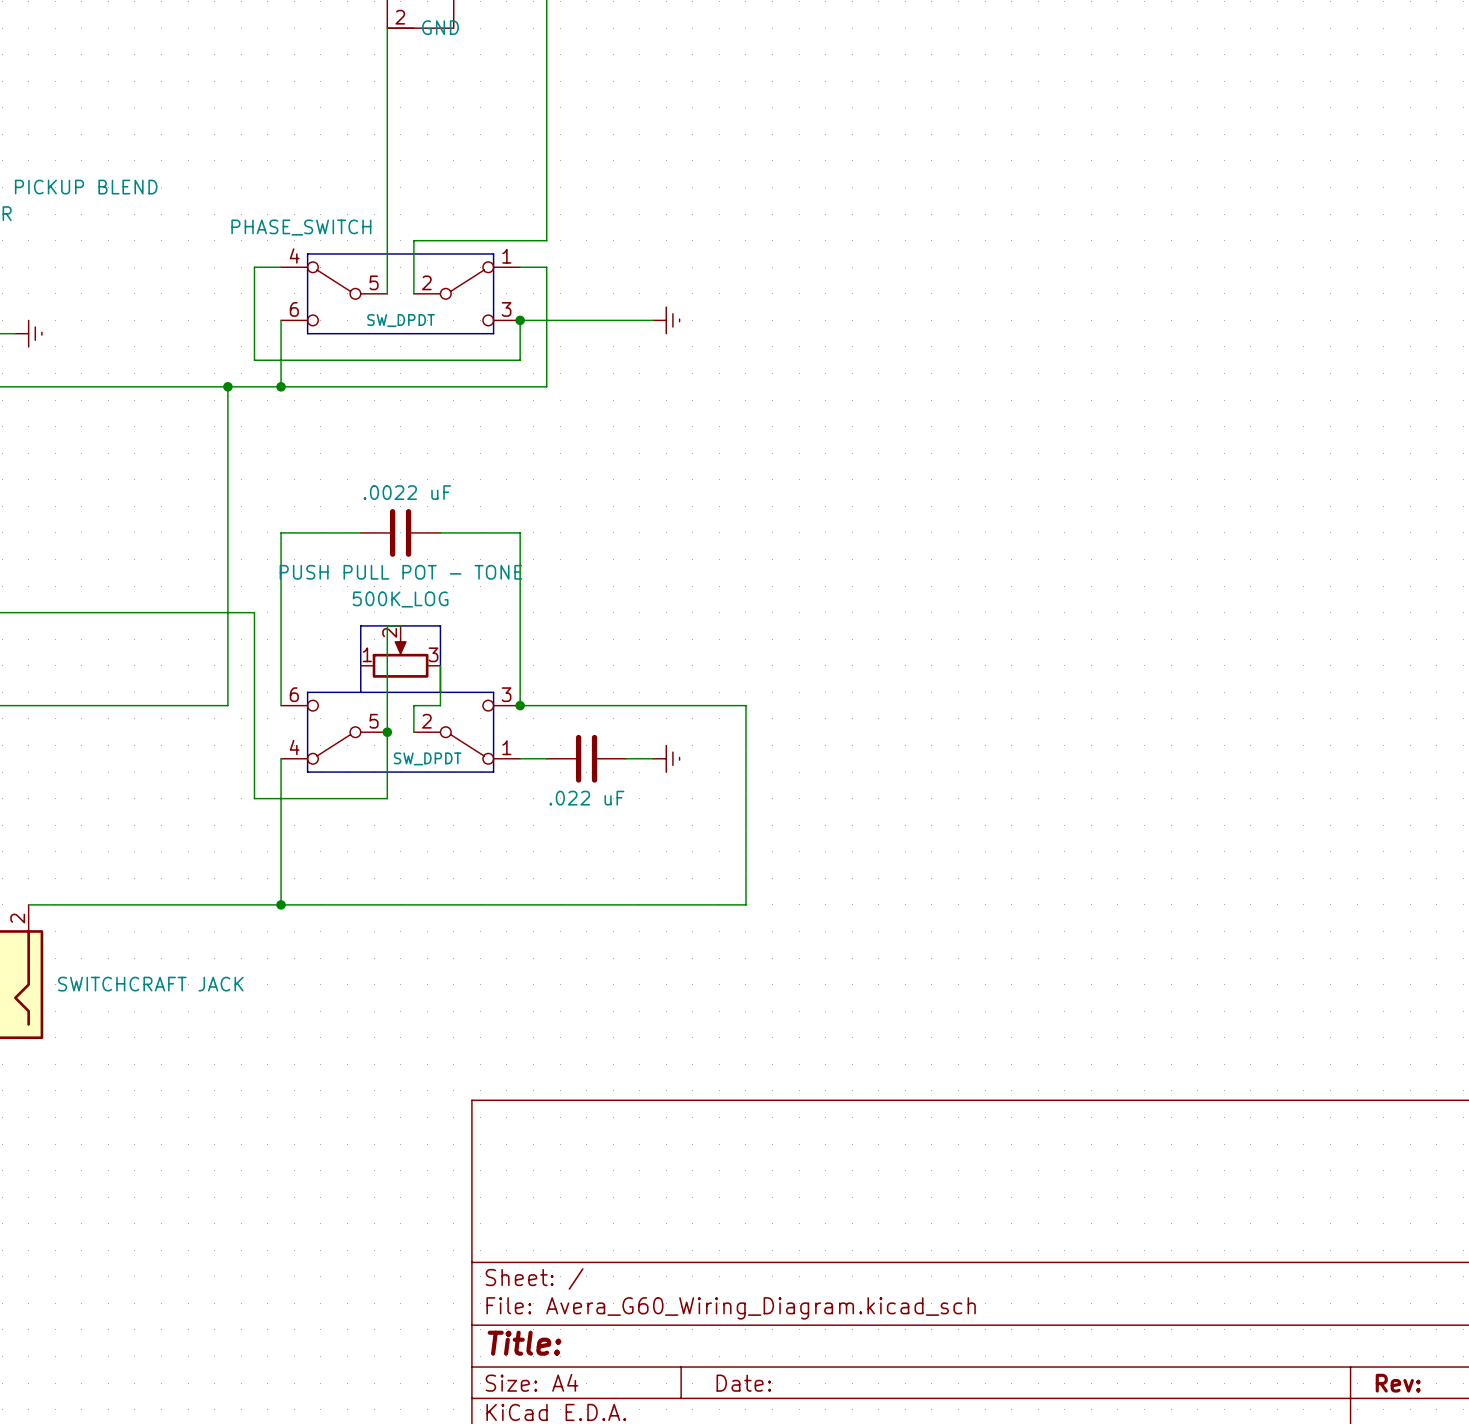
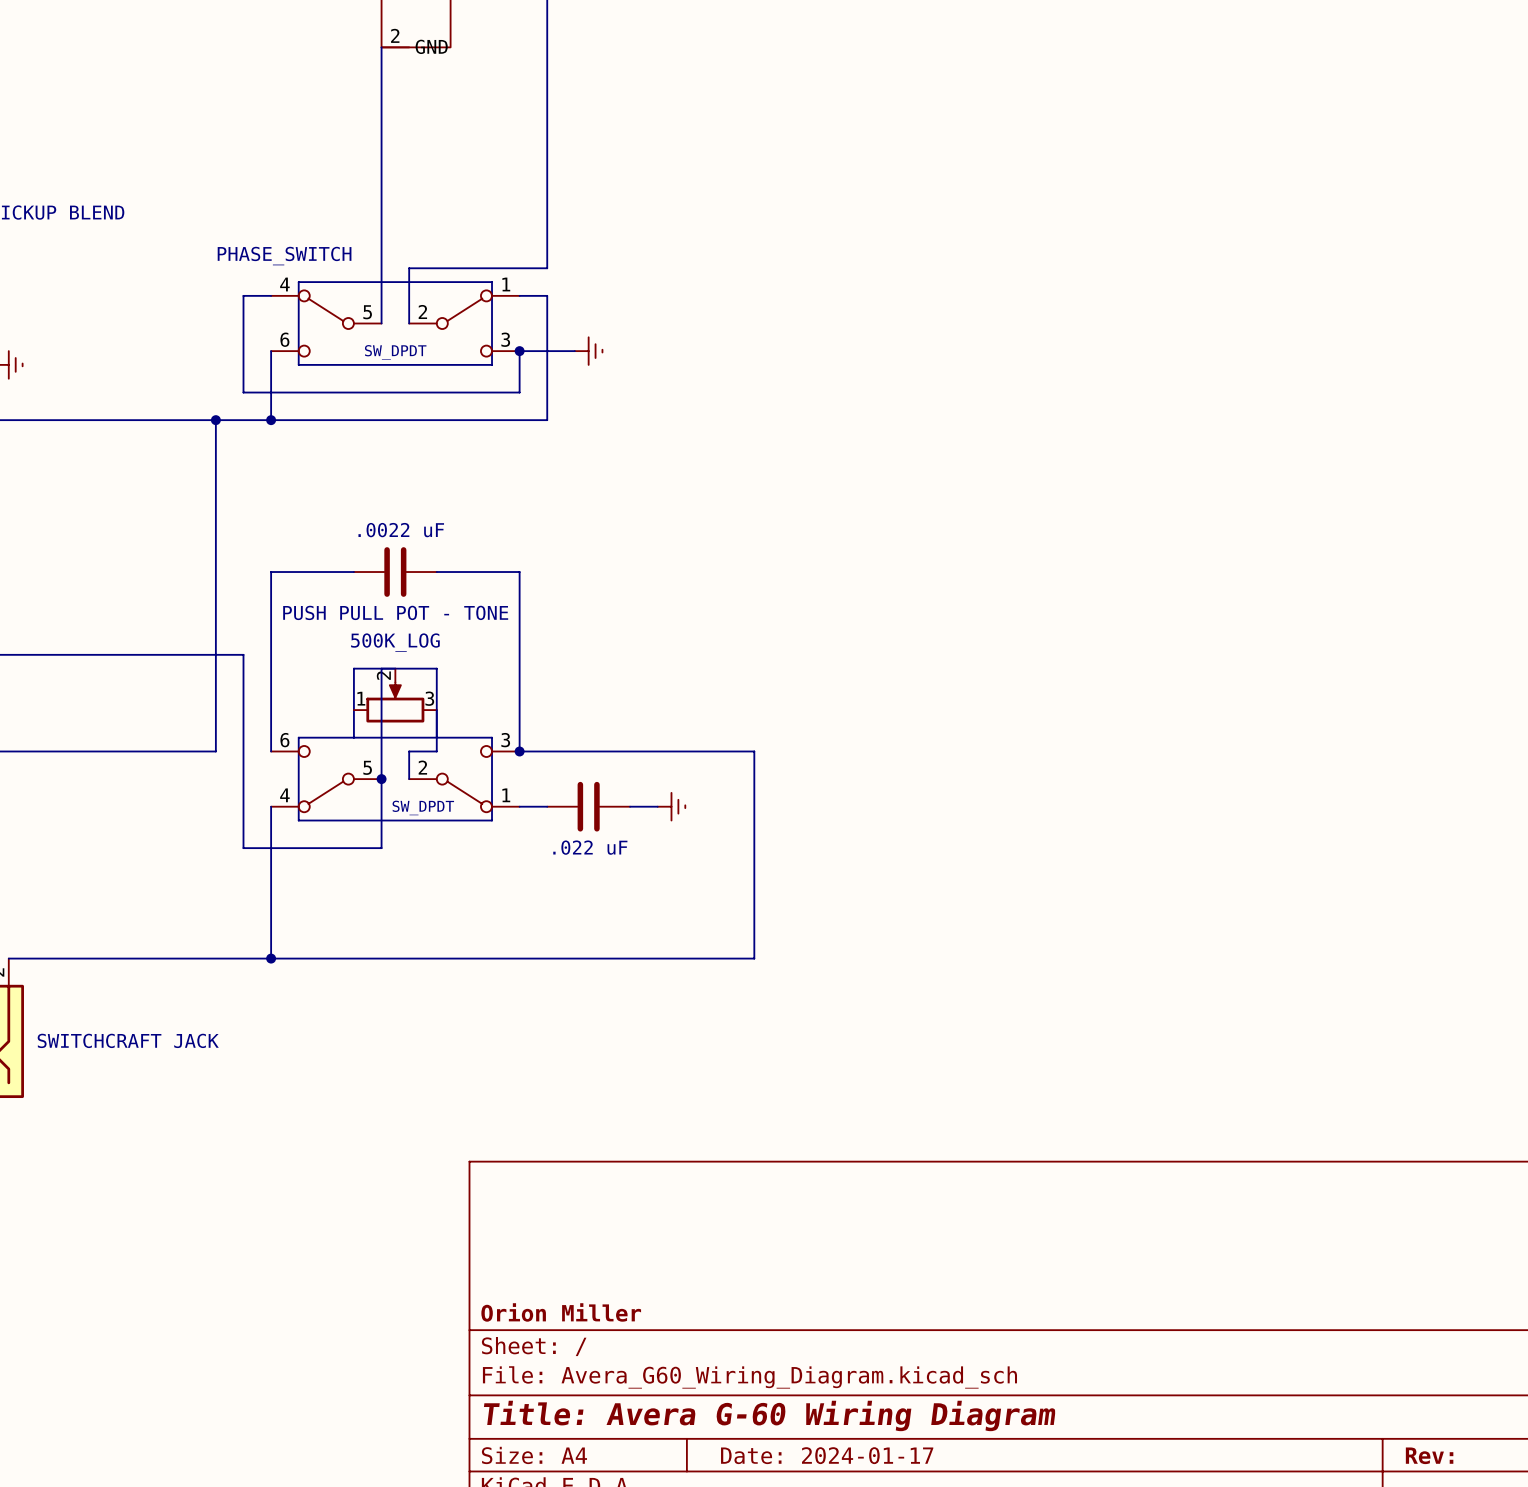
wire: (573, 320) (652, 320) -> none
power symbol position: (666, 320) -> (588, 351)
title block: none -> Orion Miller (561, 1312)
title block: Title: (524, 1343) -> Title: Avera G-60 Wiring Diagram (769, 1415)
title block: Date: (743, 1383) -> Date: 2024-01-17 (827, 1455)

